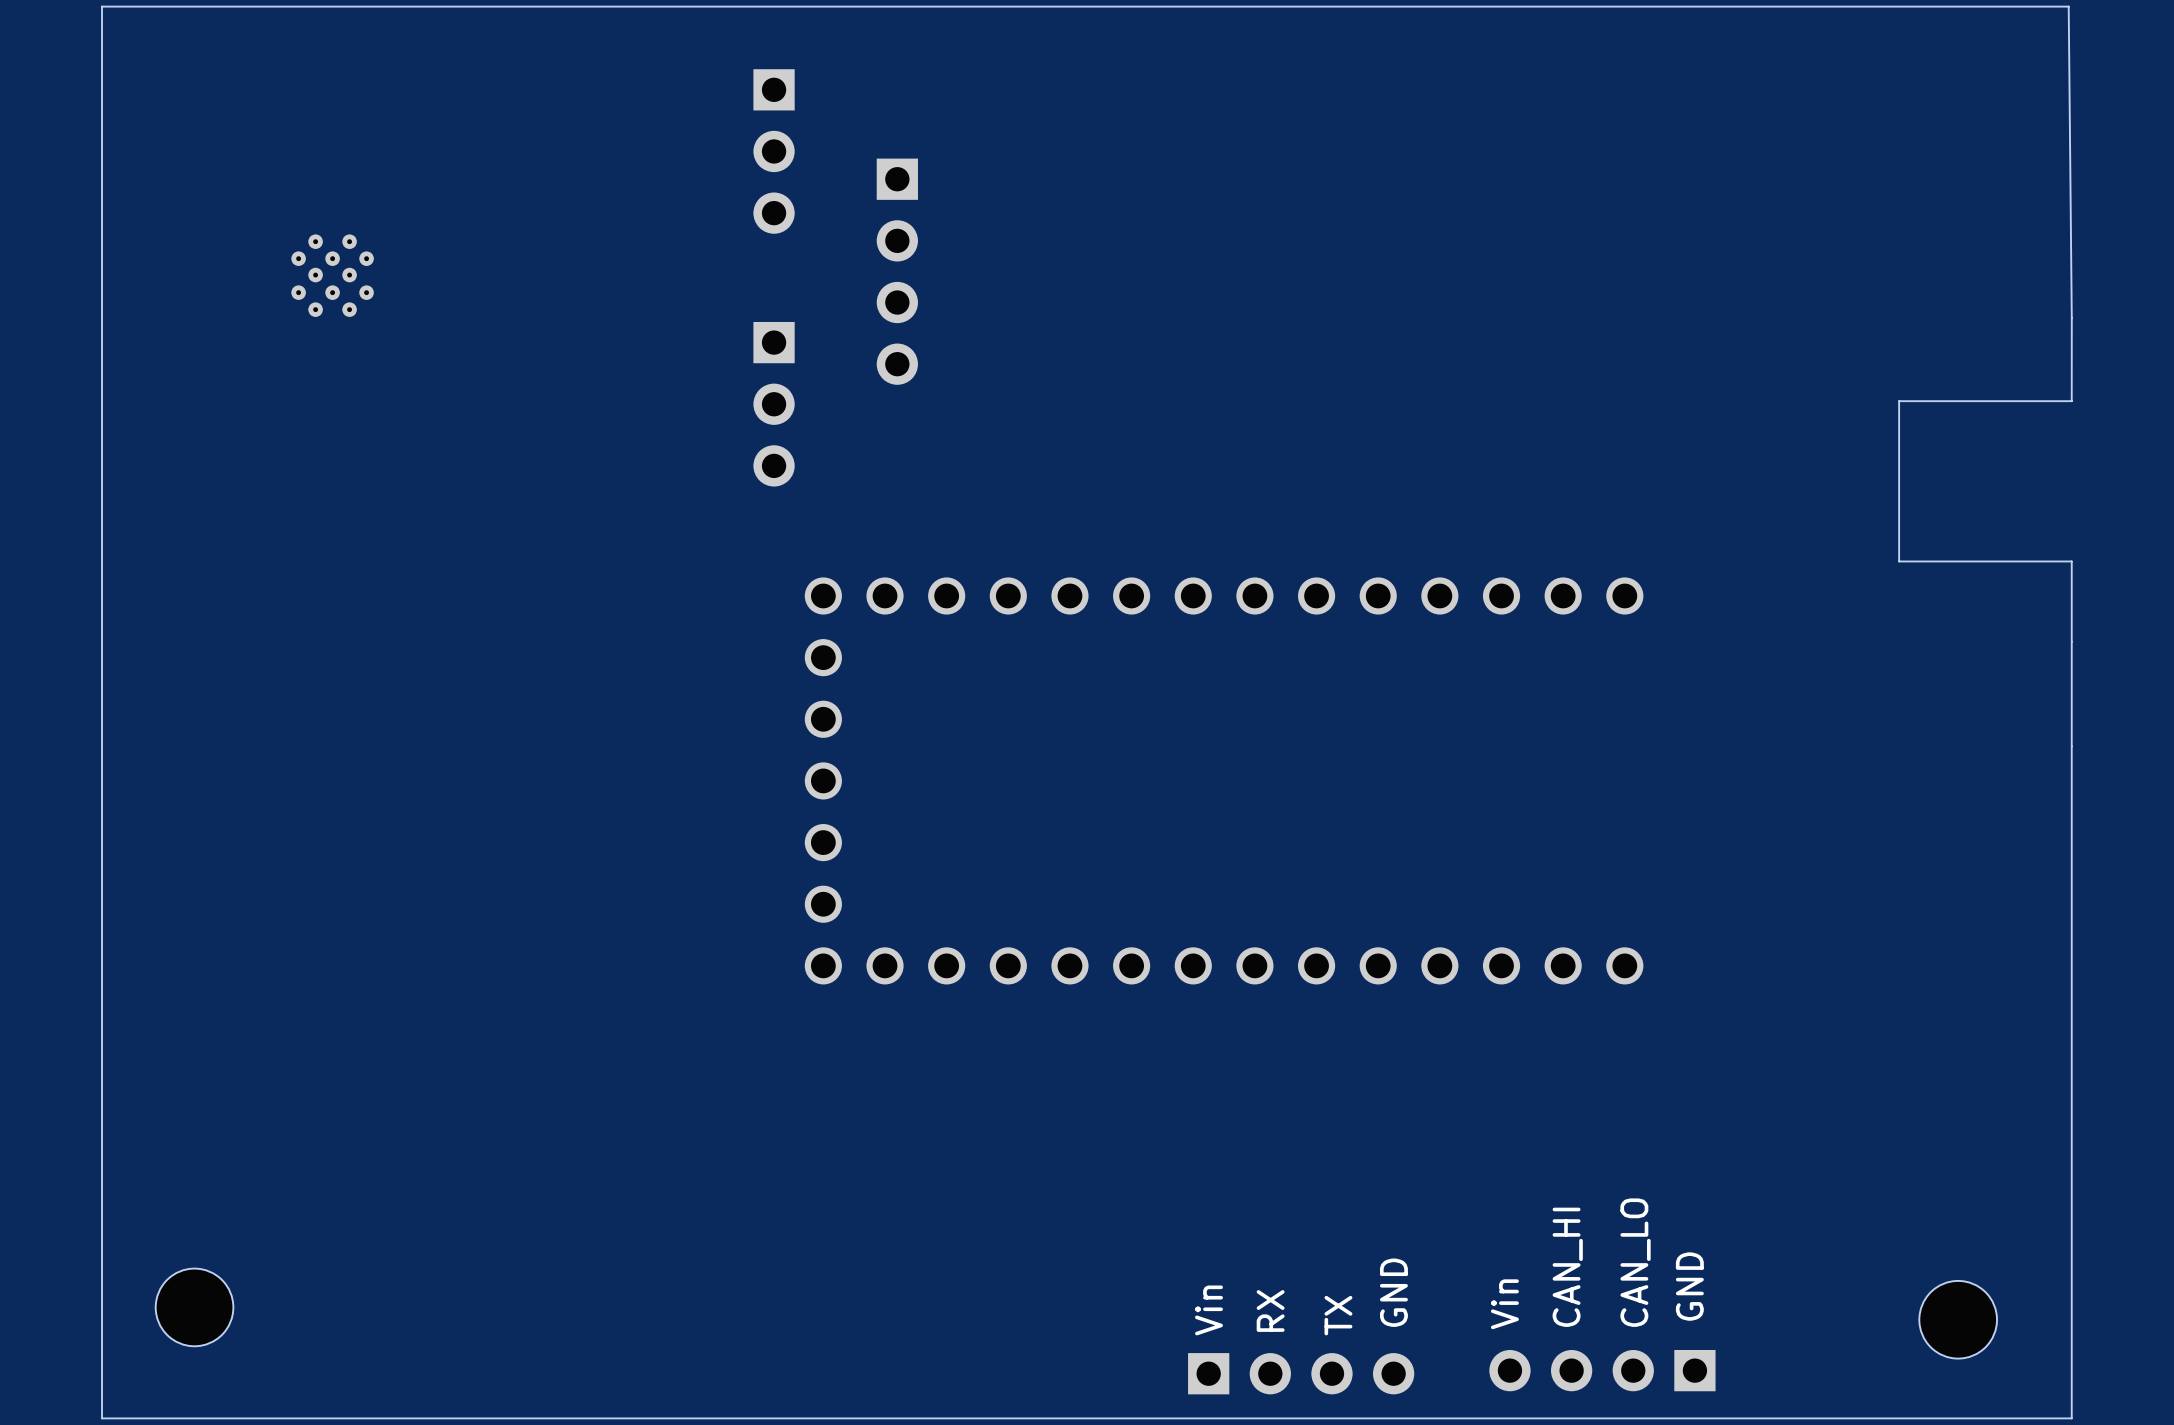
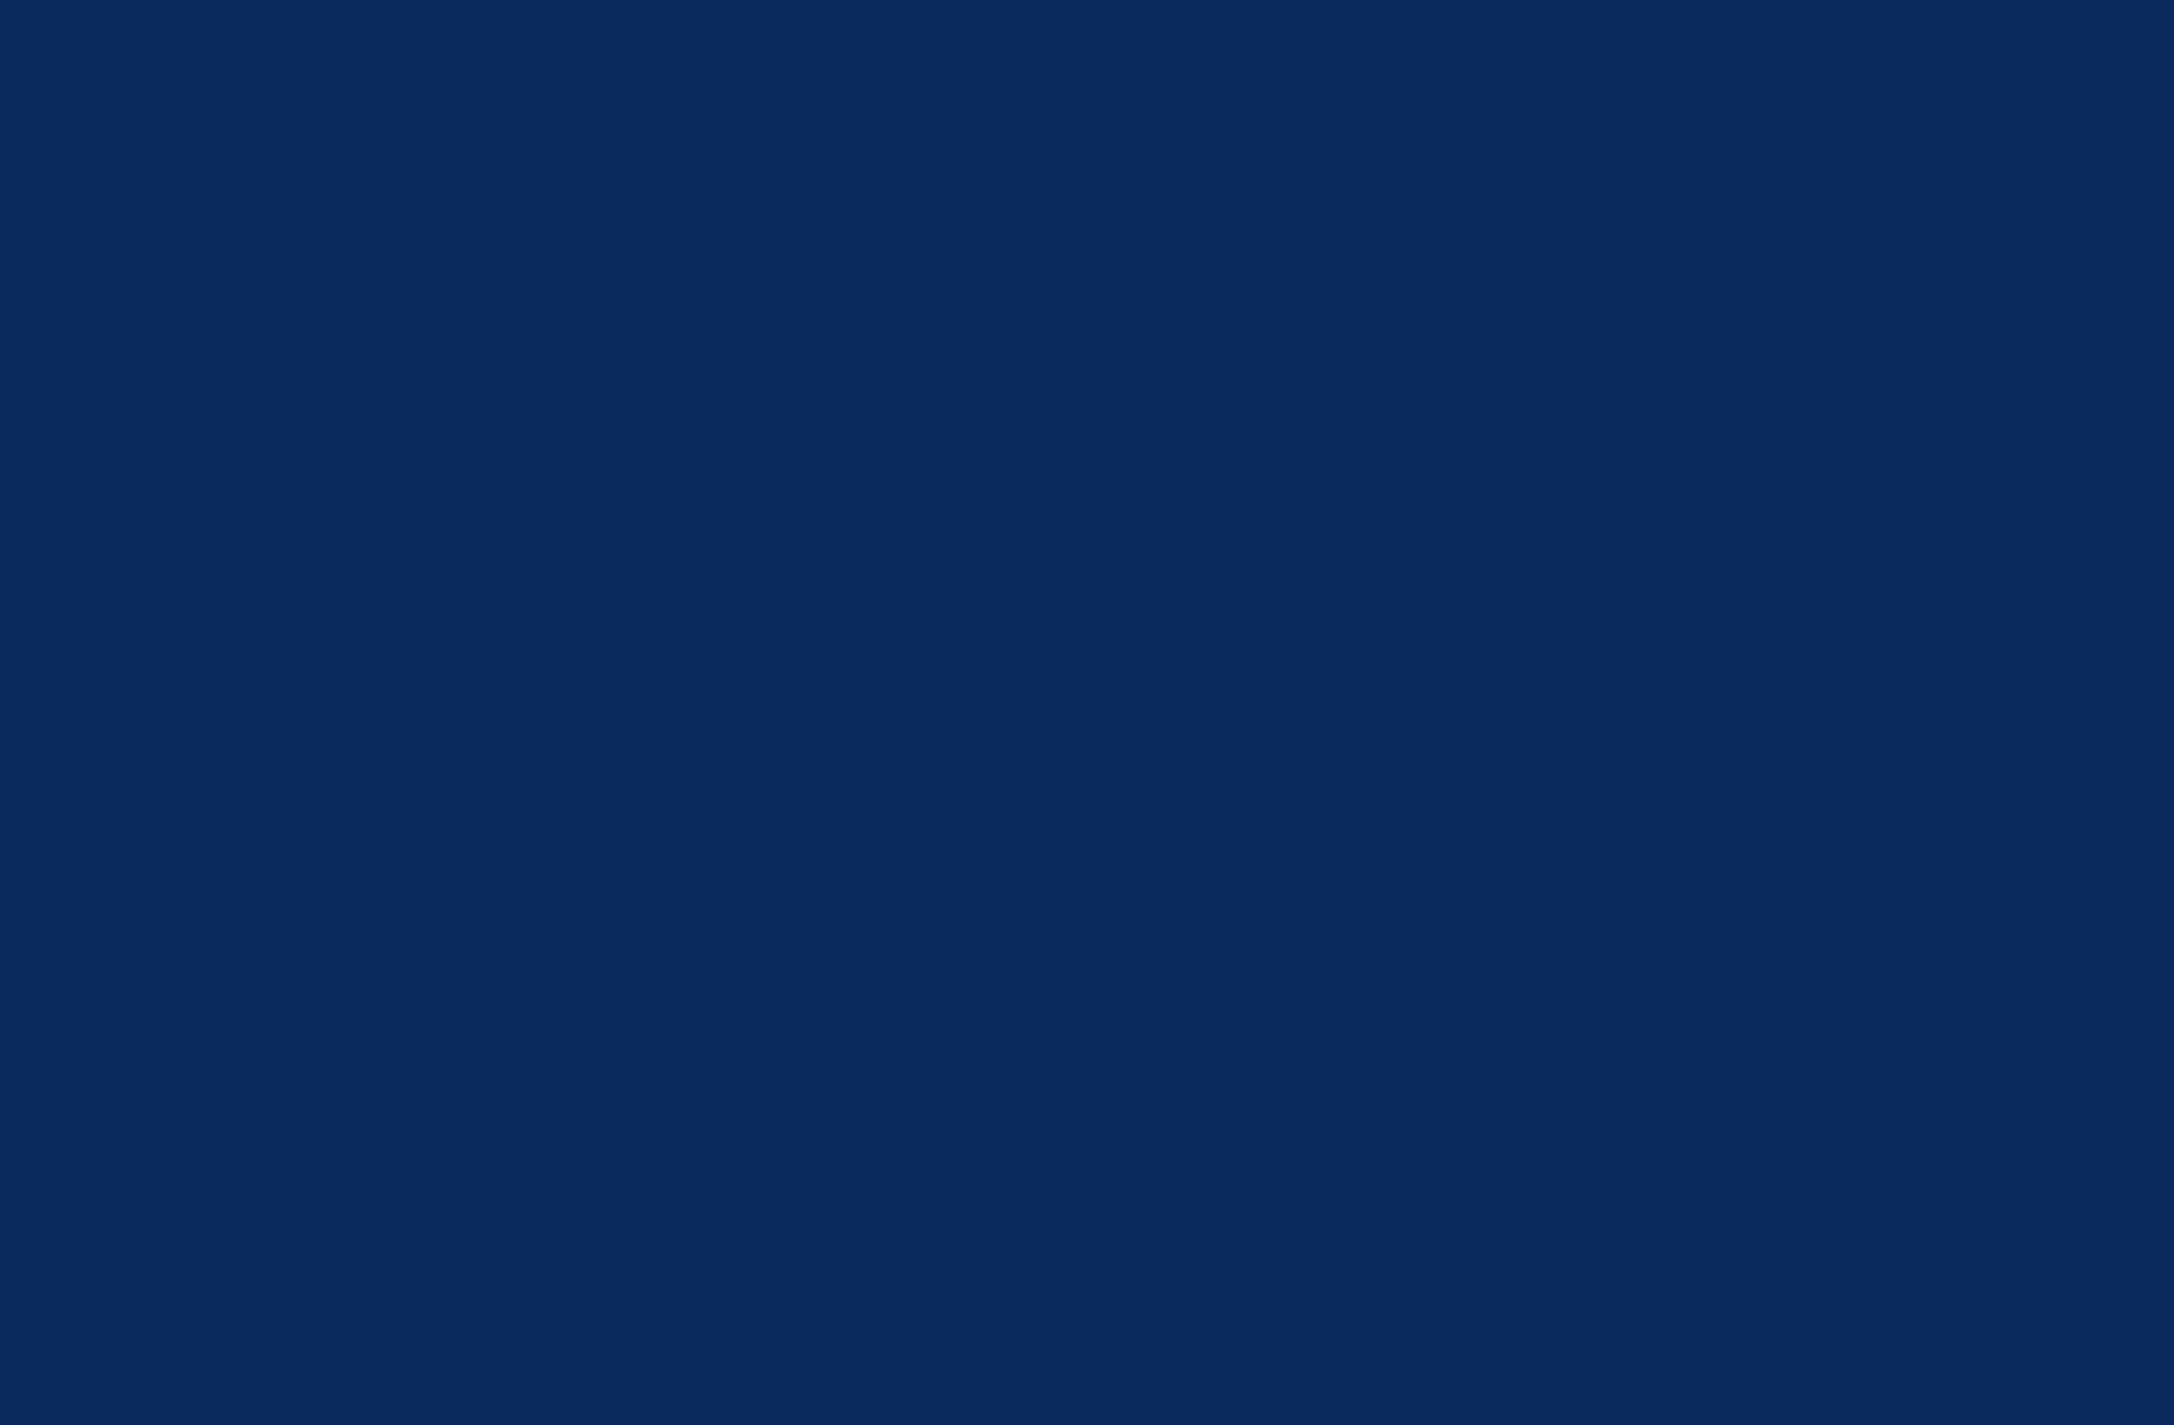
board edge: (2068, 6) (102, 6) (102, 1418) (2071, 1418) (2071, 561) (1899, 561) (1899, 401) (2071, 401) (2068, 6) -> none
part: (774, 151) -> none
part: (897, 271) -> none
part: (332, 275) -> none
part: (774, 404) -> none
part: (1224, 780) -> none
text: CAN_LO (1635, 1262) -> none
text: CAN_HI (1567, 1267) -> none
text: GND (1689, 1286) -> none
text: GND (1393, 1292) -> none
text: Vin (1504, 1304) -> none
part: (194, 1307) -> none
text: Vin (1208, 1310) -> none
text: RX (1270, 1311) -> none
text: TX (1338, 1315) -> none
part: (1958, 1319) -> none
part: (1602, 1370) -> none
part: (1301, 1373) -> none

